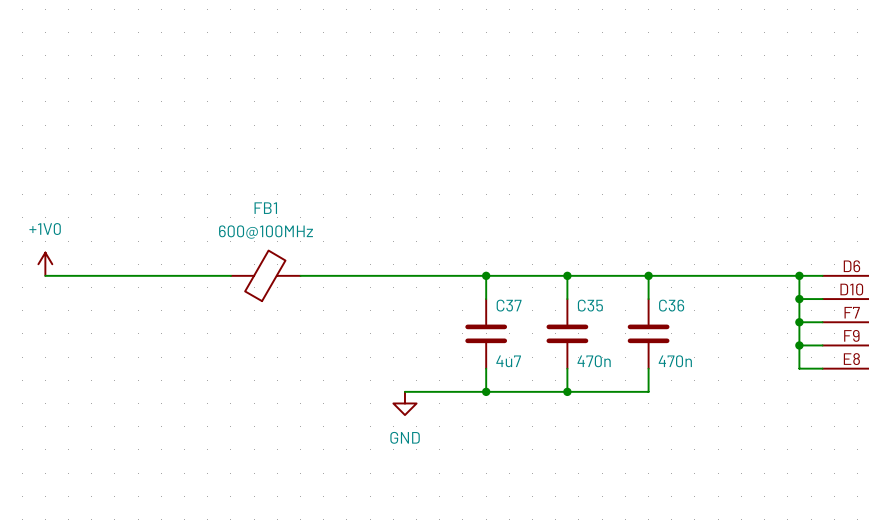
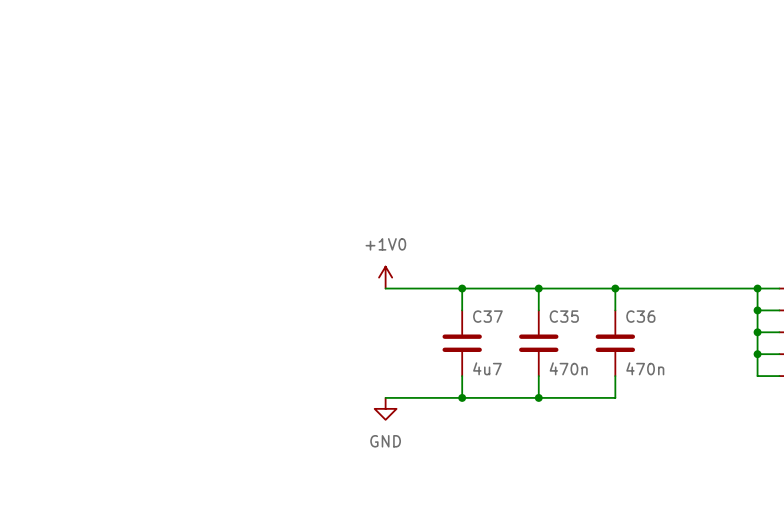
power symbol: +1V0 (45, 264) -> none
power symbol: none -> +1V0 (385, 277)
wire: (45, 275) (230, 275) -> none
FB1: 600@100MHz (265, 275) -> none
wire: (300, 275) (404, 275) -> none

